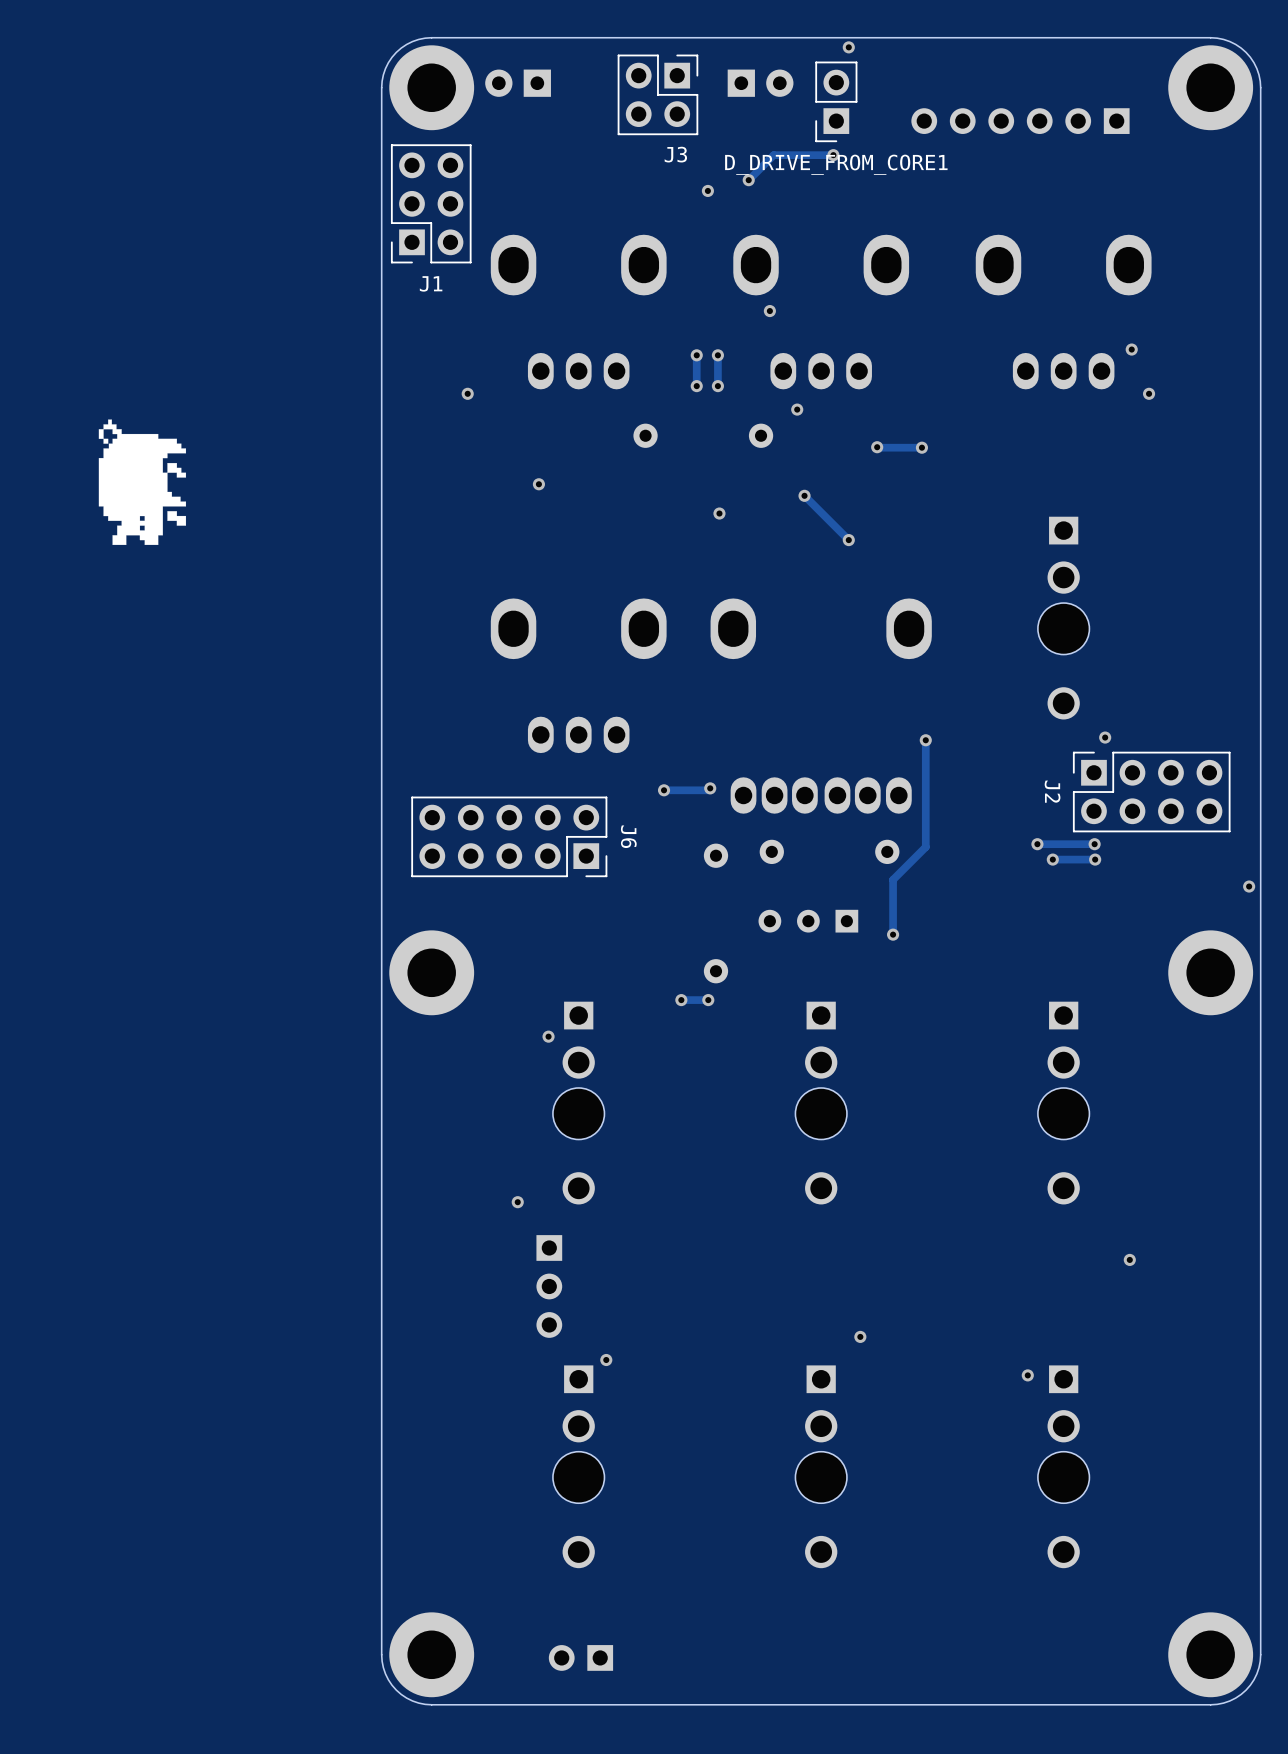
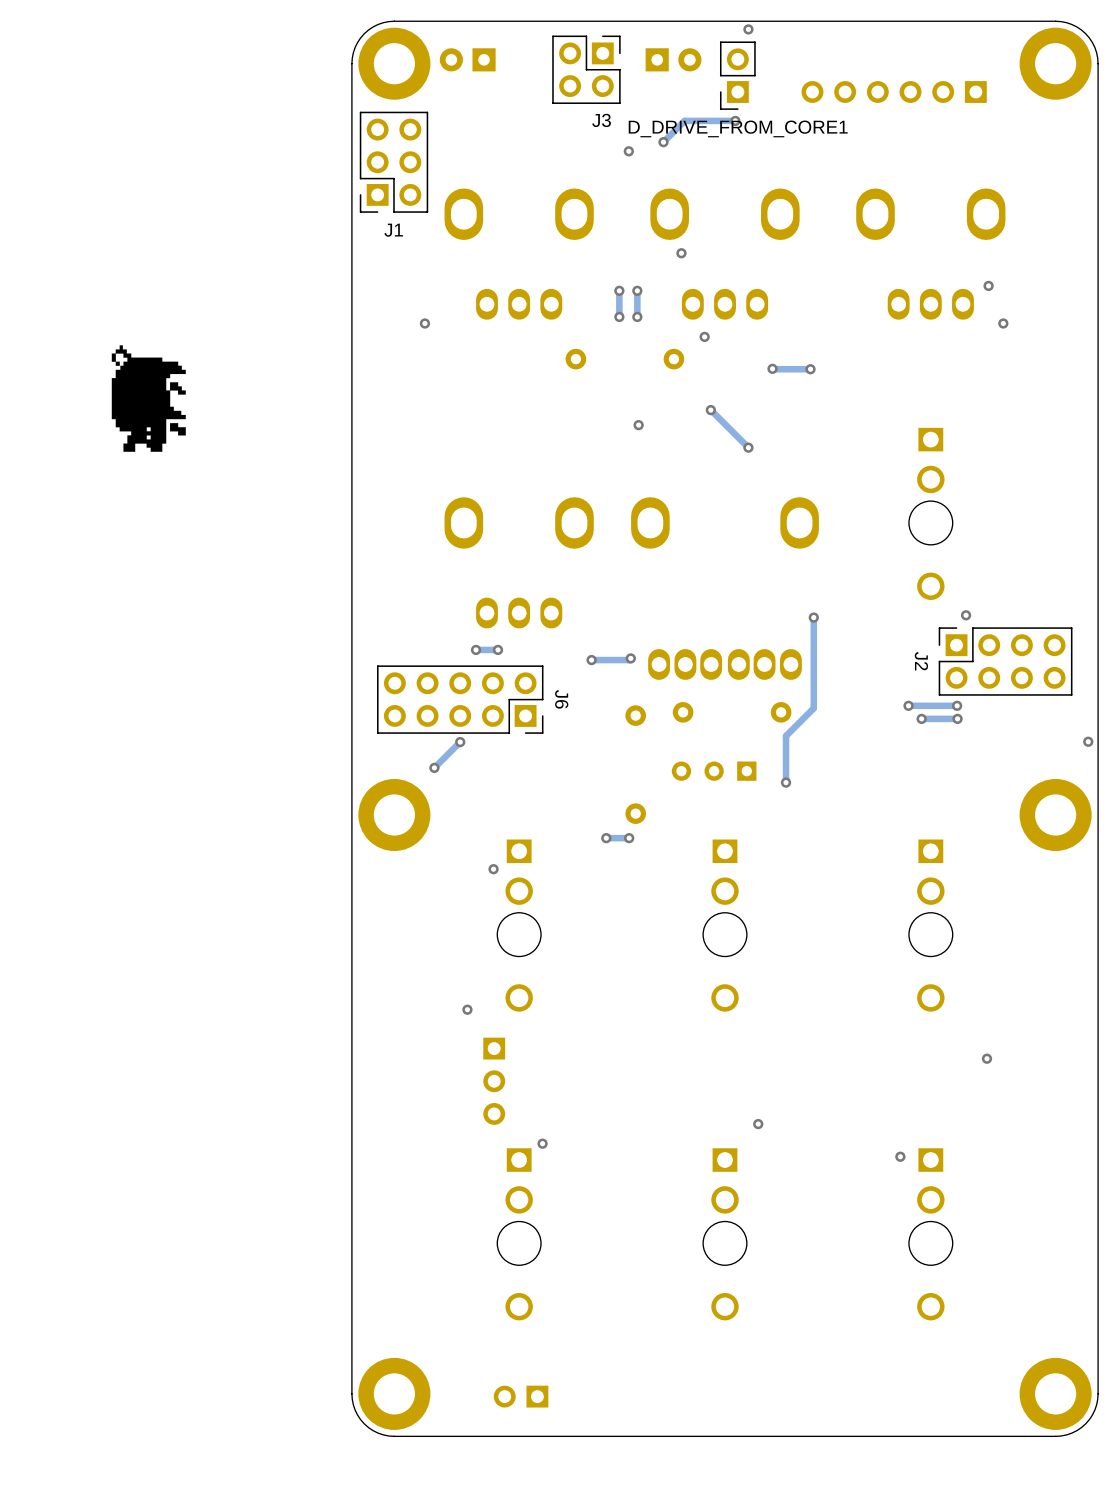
via: (538, 484) -> none
via: none -> (476, 649)
track: none -> (497, 649) (476, 649)
via: none -> (497, 649)
track: none -> (460, 742) (434, 767)
via: none -> (460, 742)
via: none -> (434, 767)

